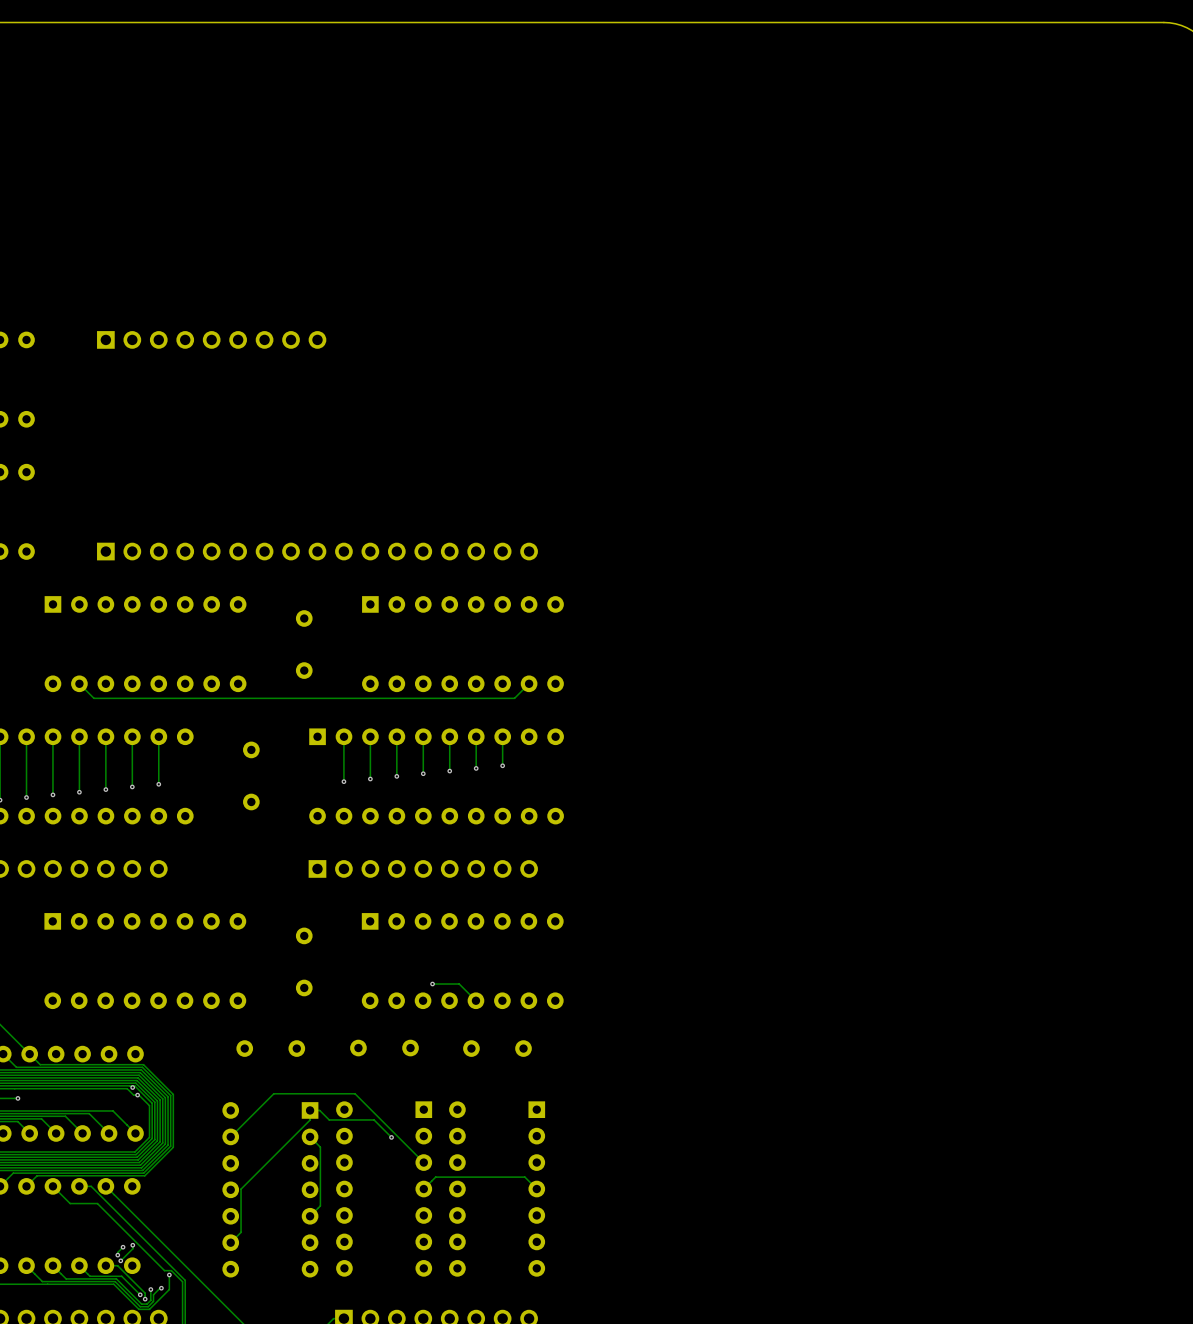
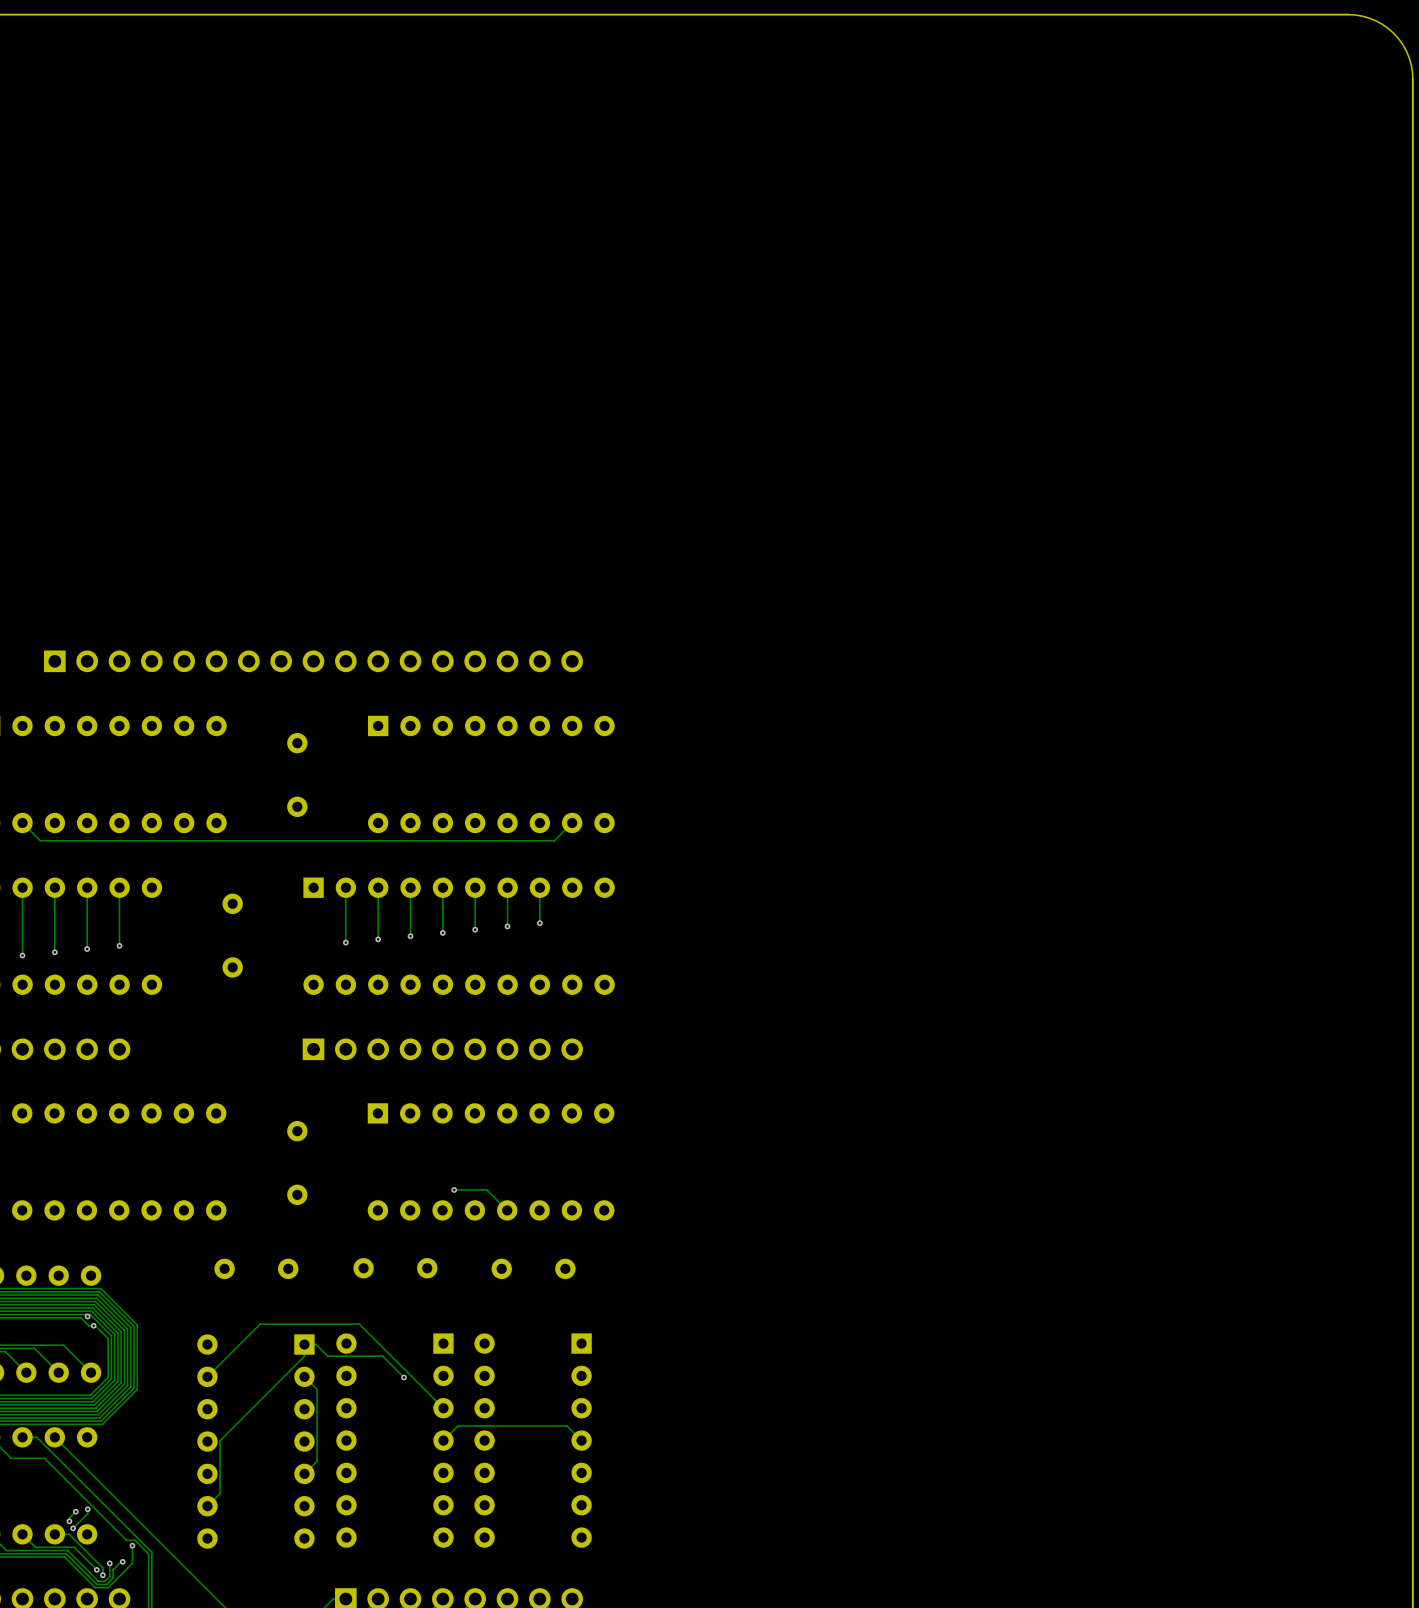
part: (211, 339) -> none

